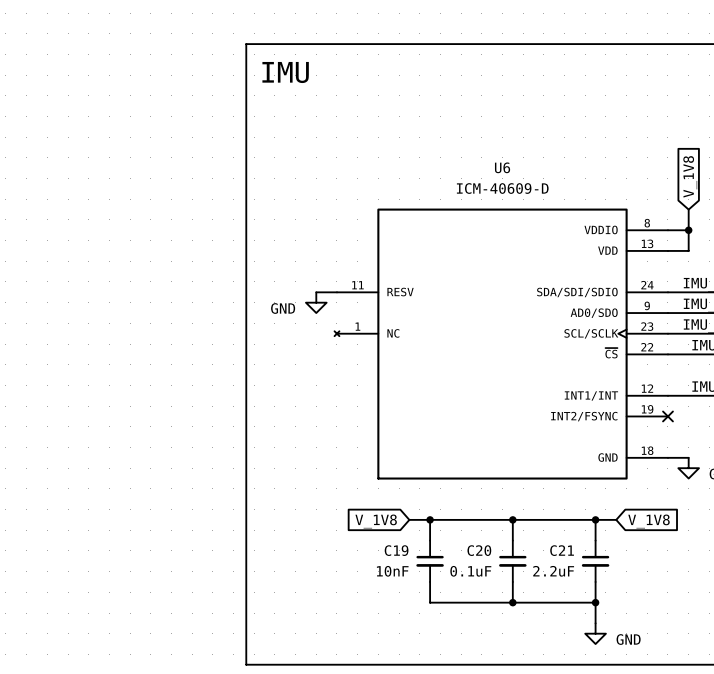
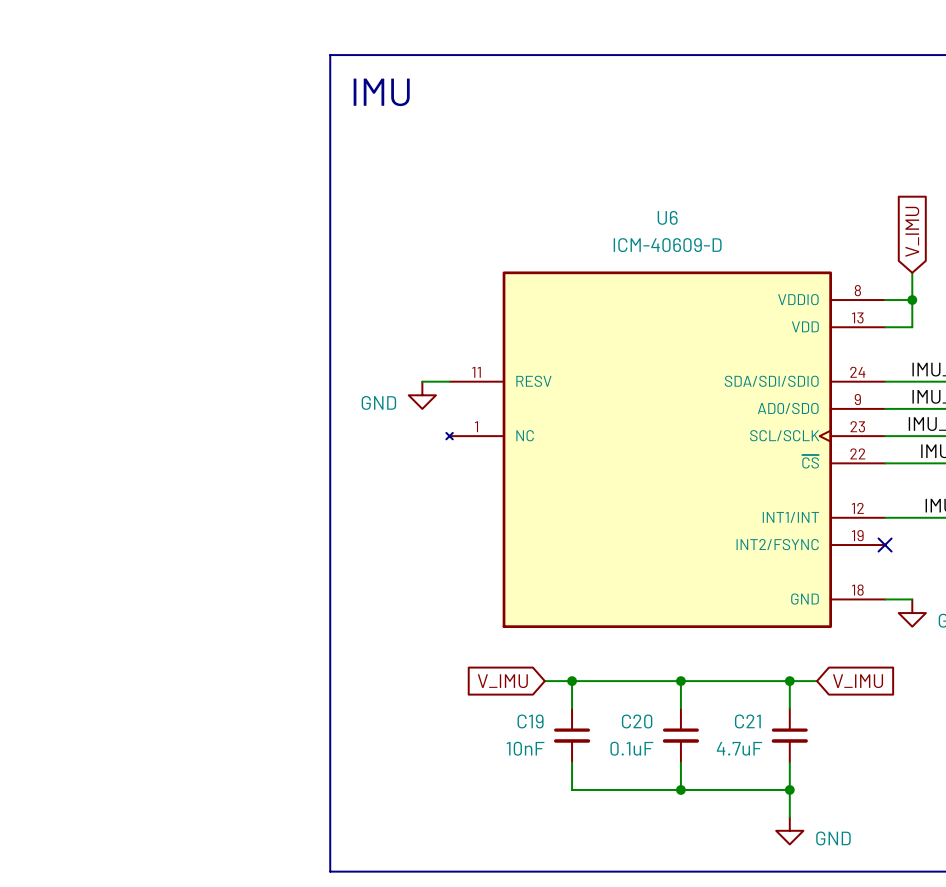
global label: V_1V8 (690, 176) -> V_IMU (912, 231)
global label: V_1V8 (376, 521) -> V_IMU (502, 681)
global label: V_1V8 (649, 521) -> V_IMU (858, 681)
C21 value: 2.2uF (553, 571) -> 4.7uF (739, 748)

